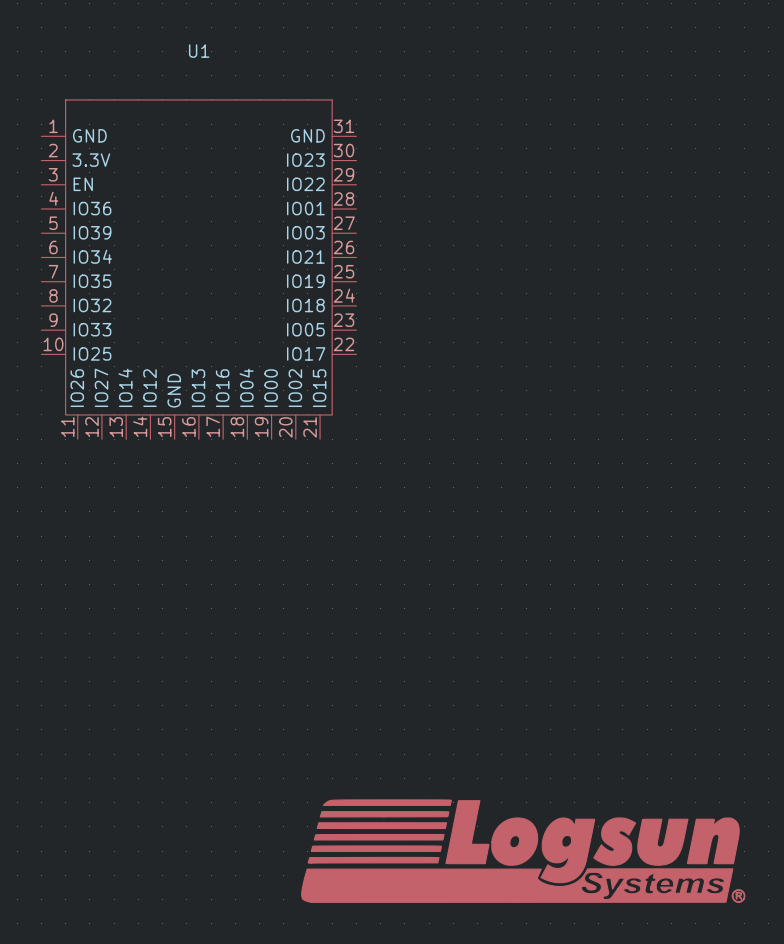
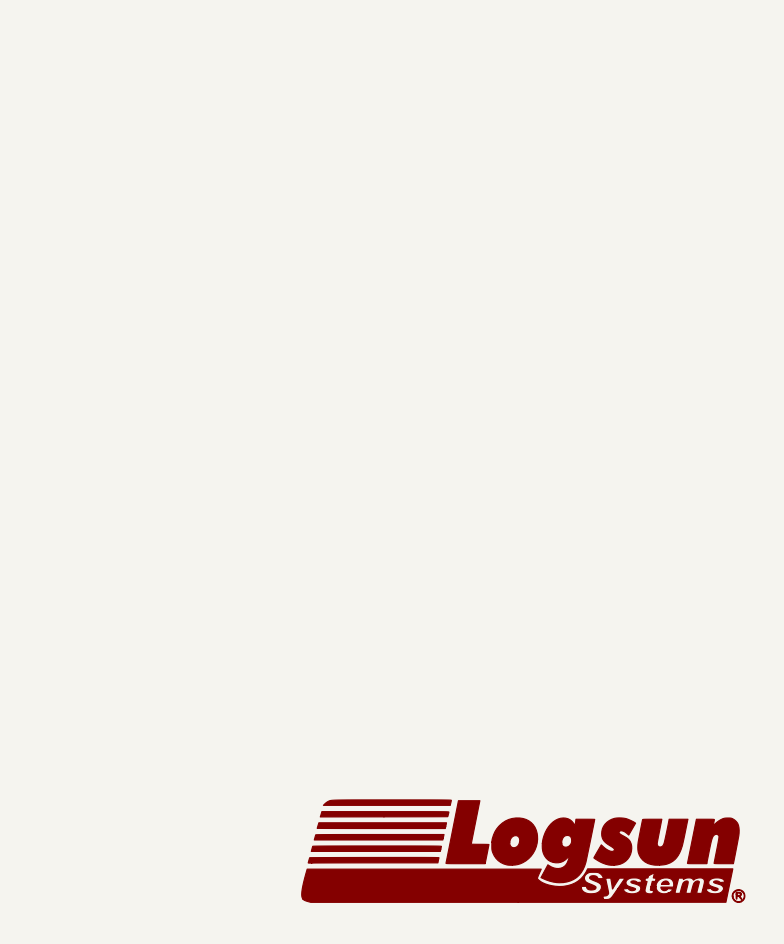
U1: (198, 269) -> none

